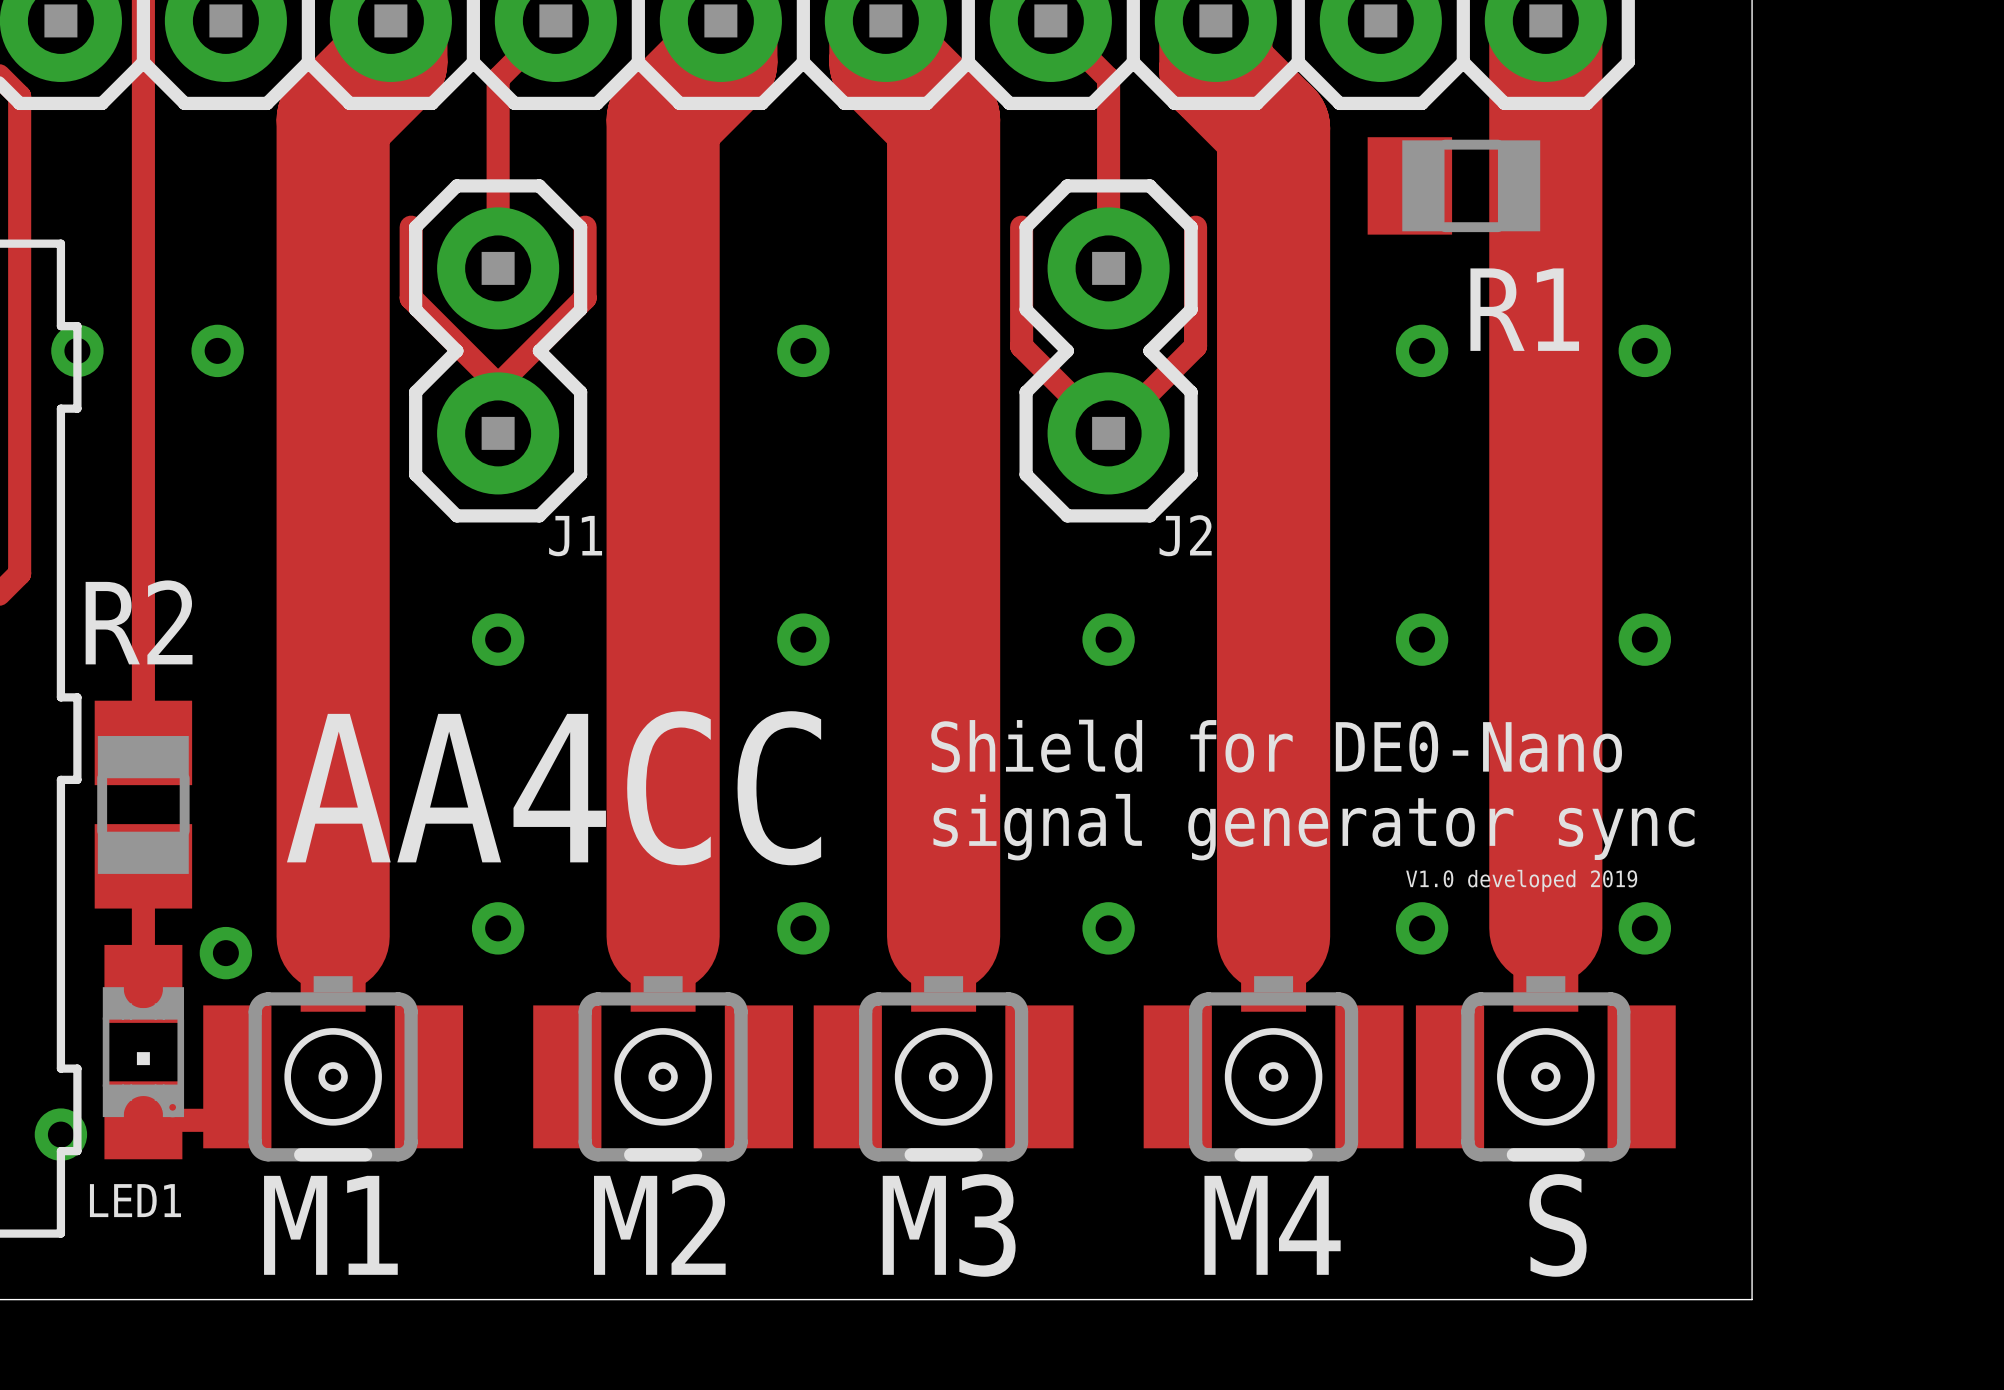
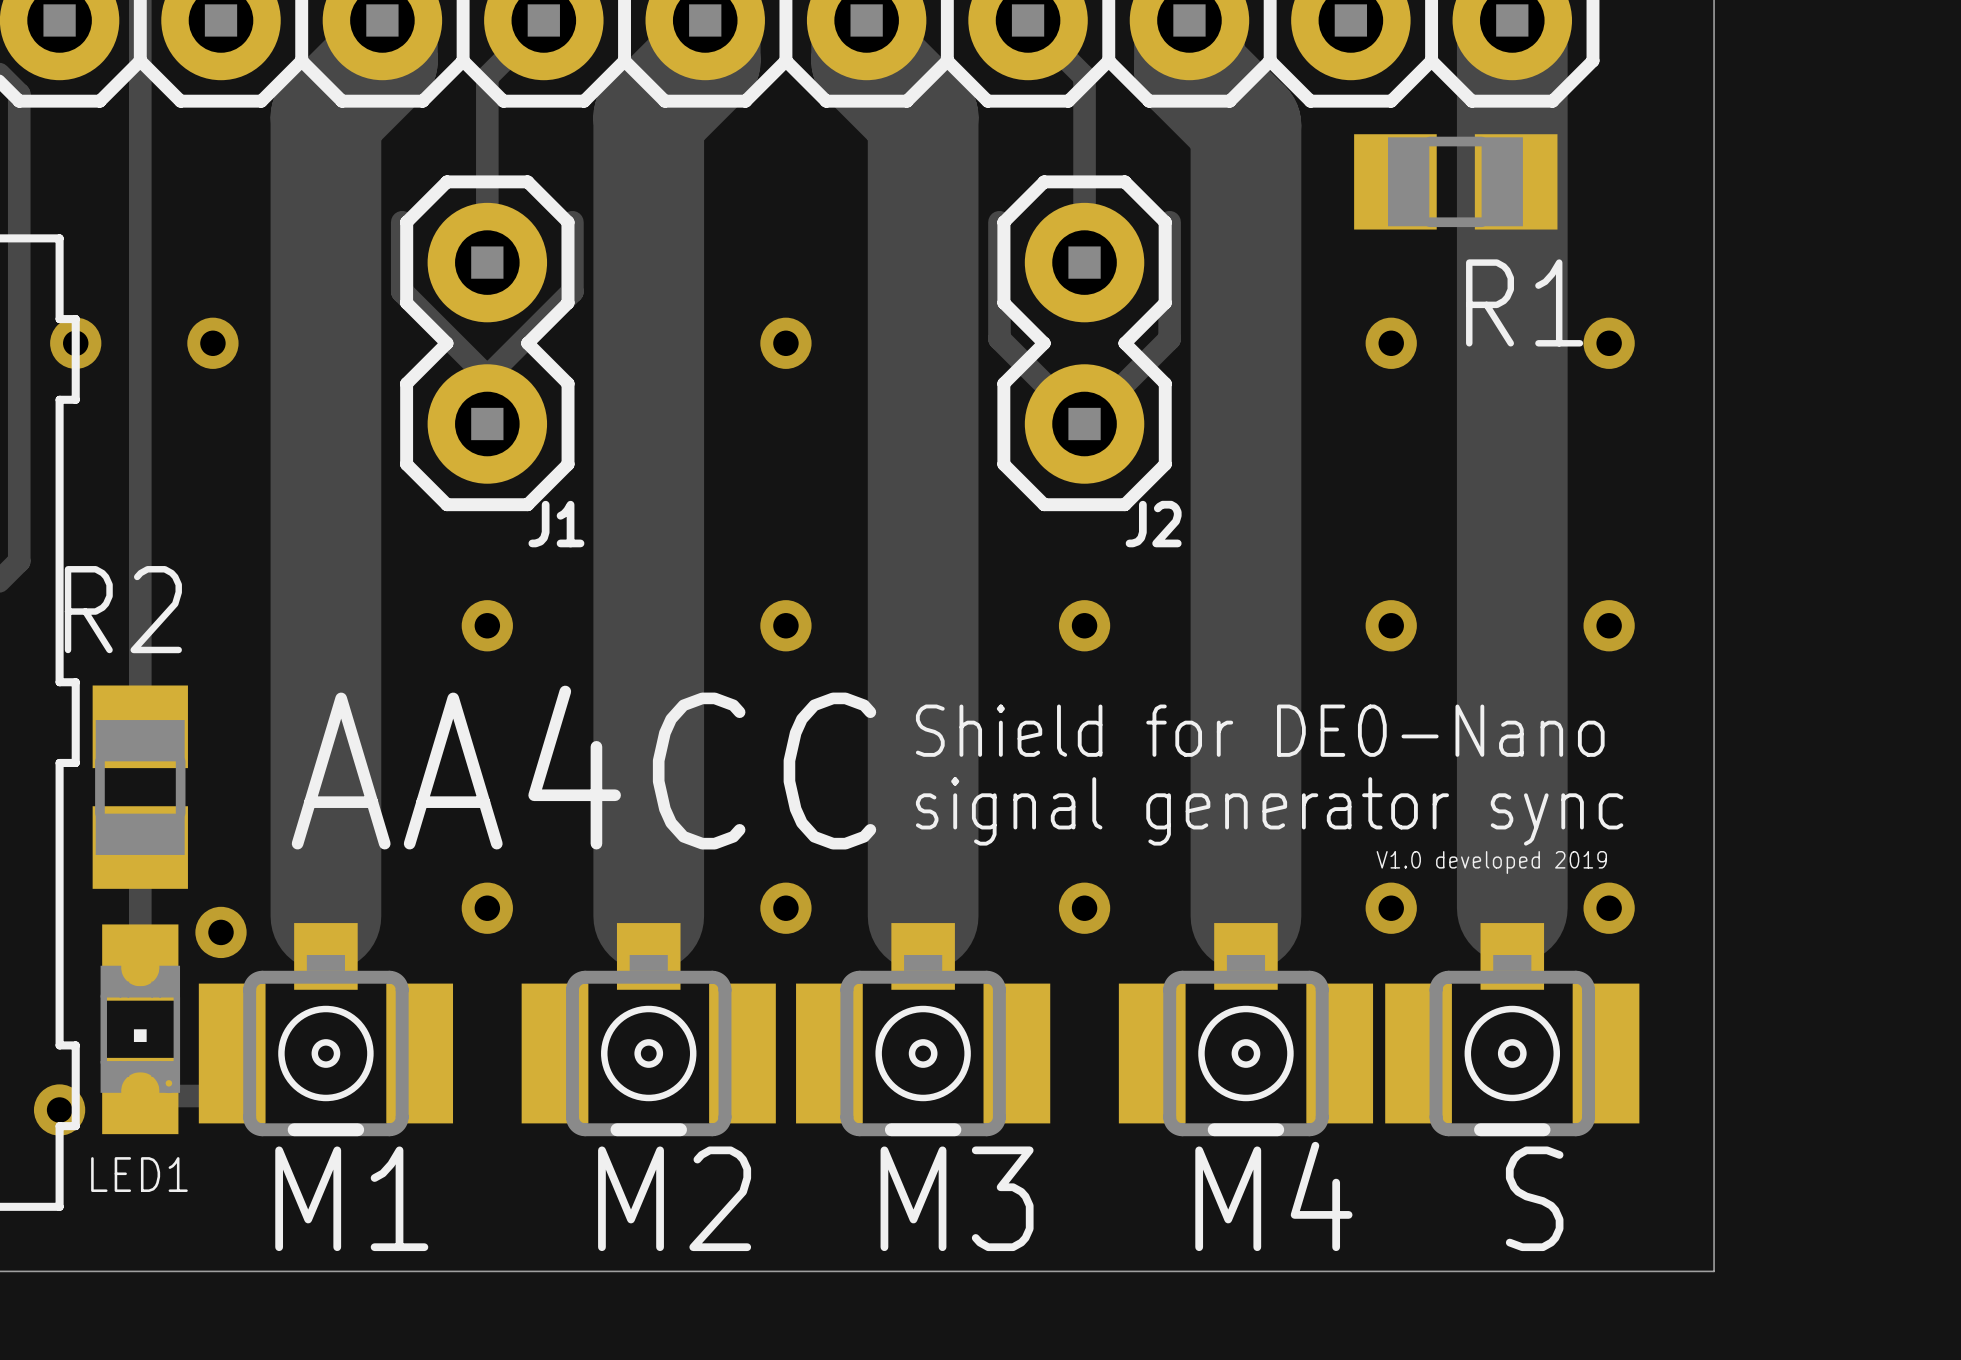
R1 position: (1471, 185) -> (1455, 181)

